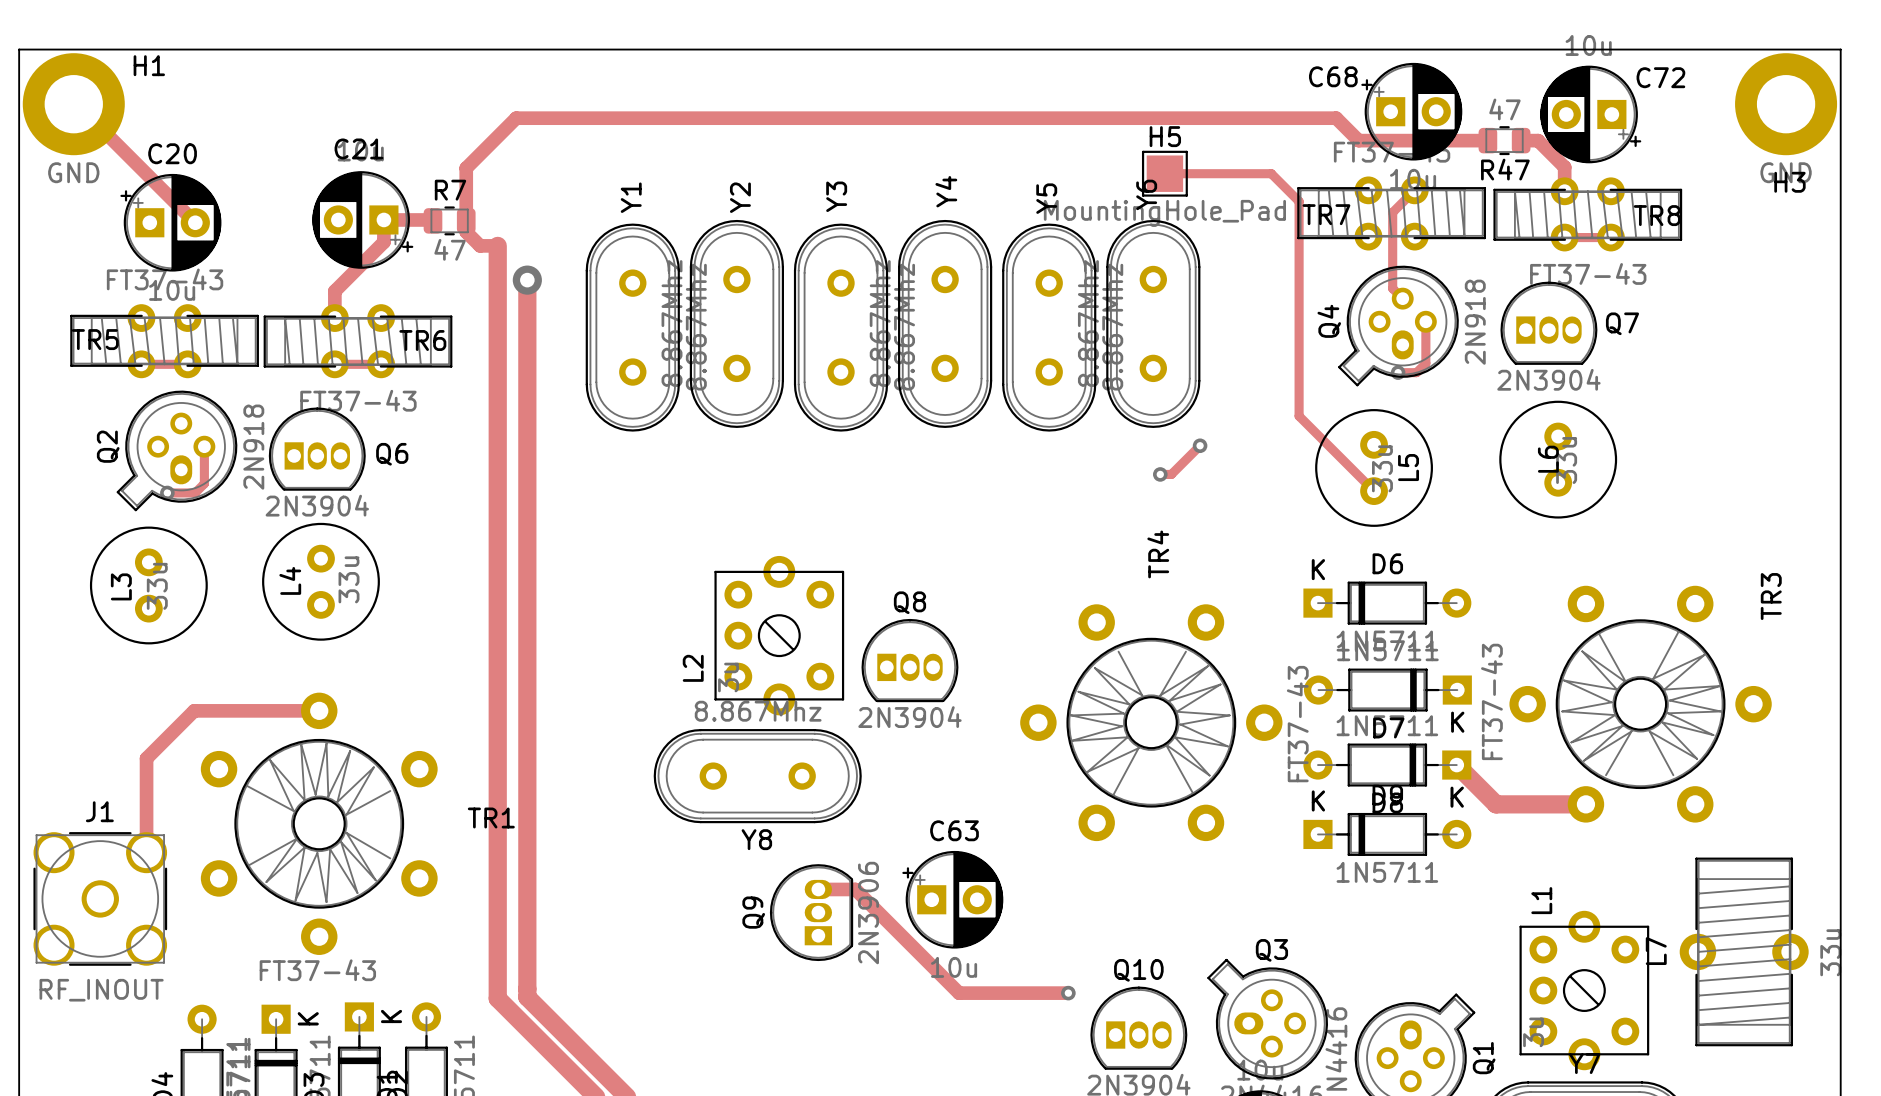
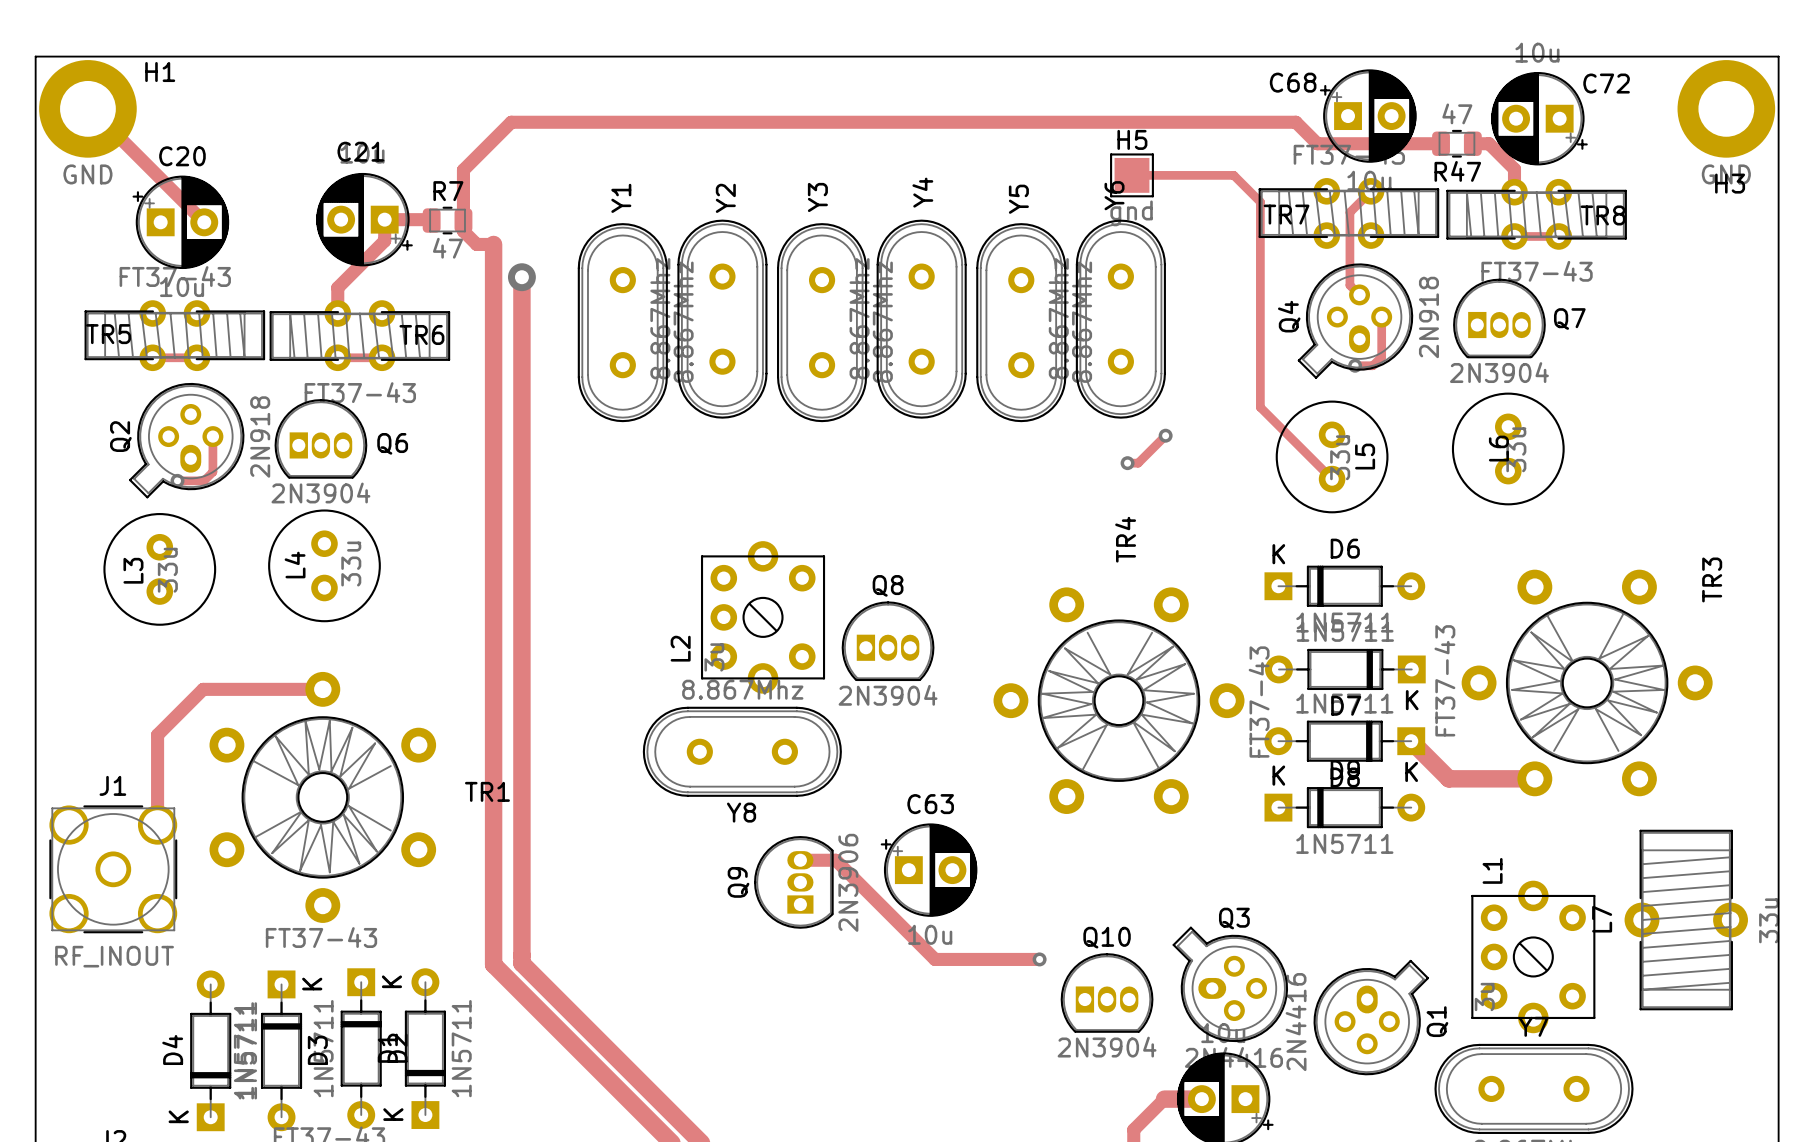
H5 value: MountingHole_Pad (1164, 213) -> gnd (1131, 213)

